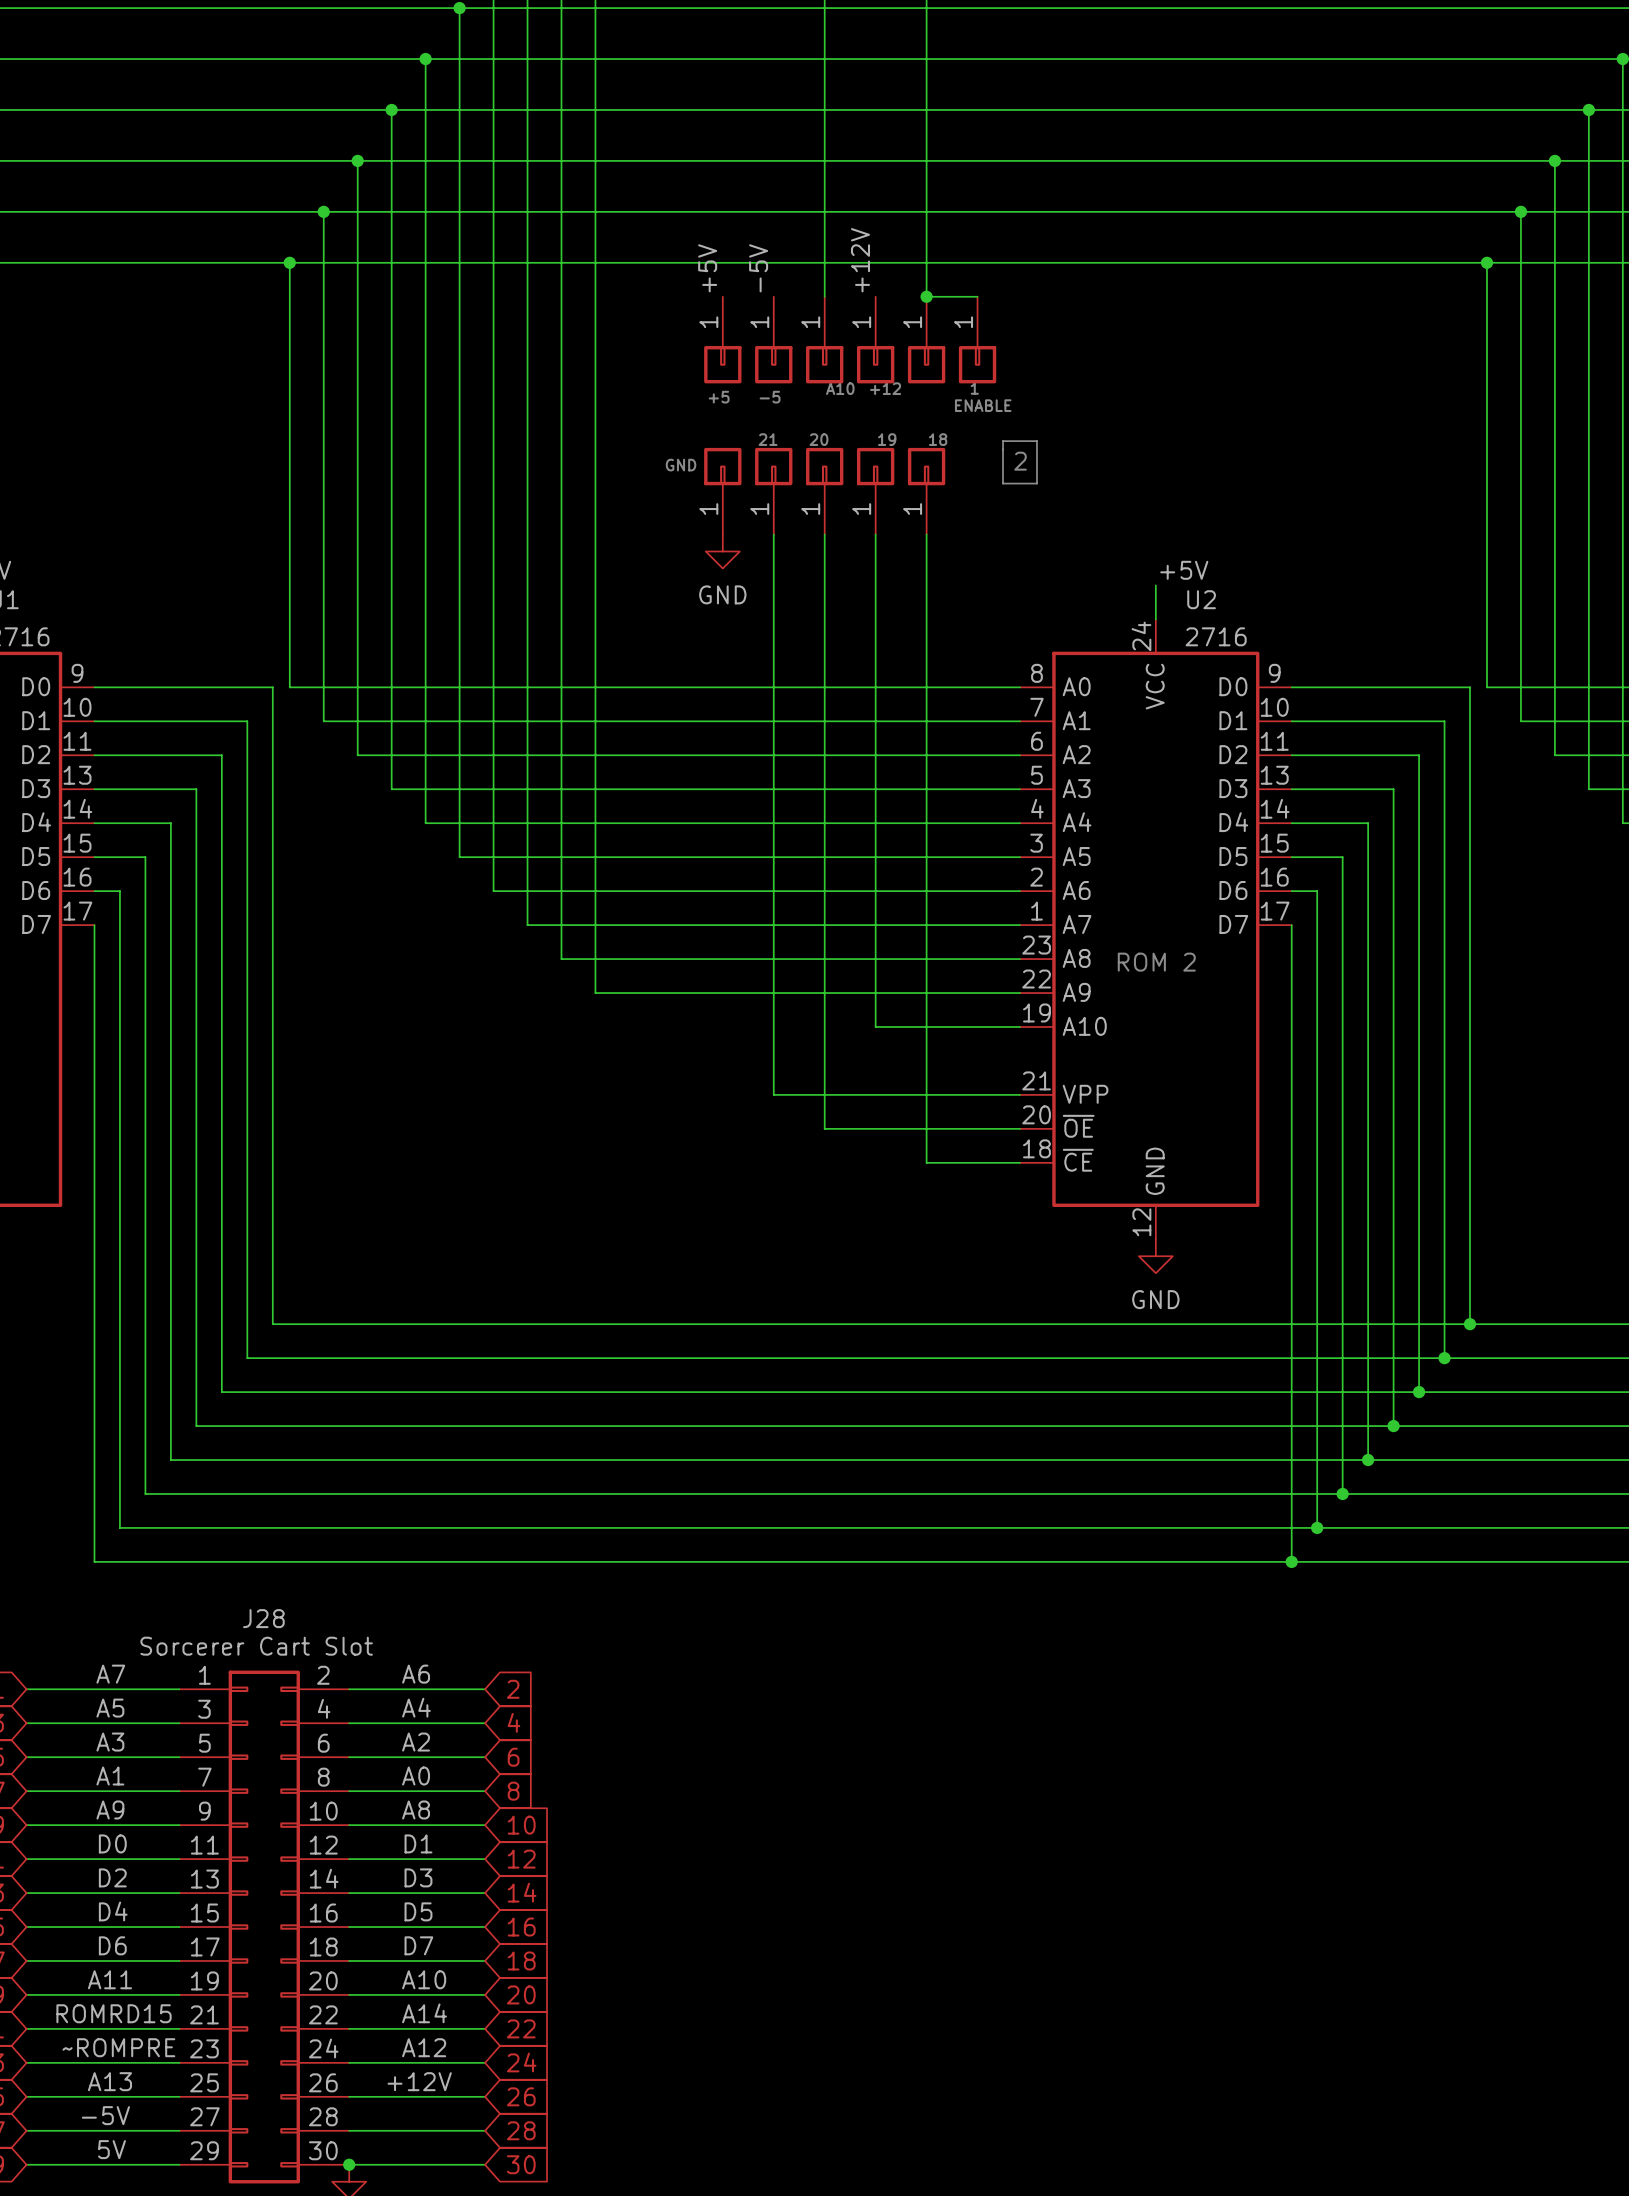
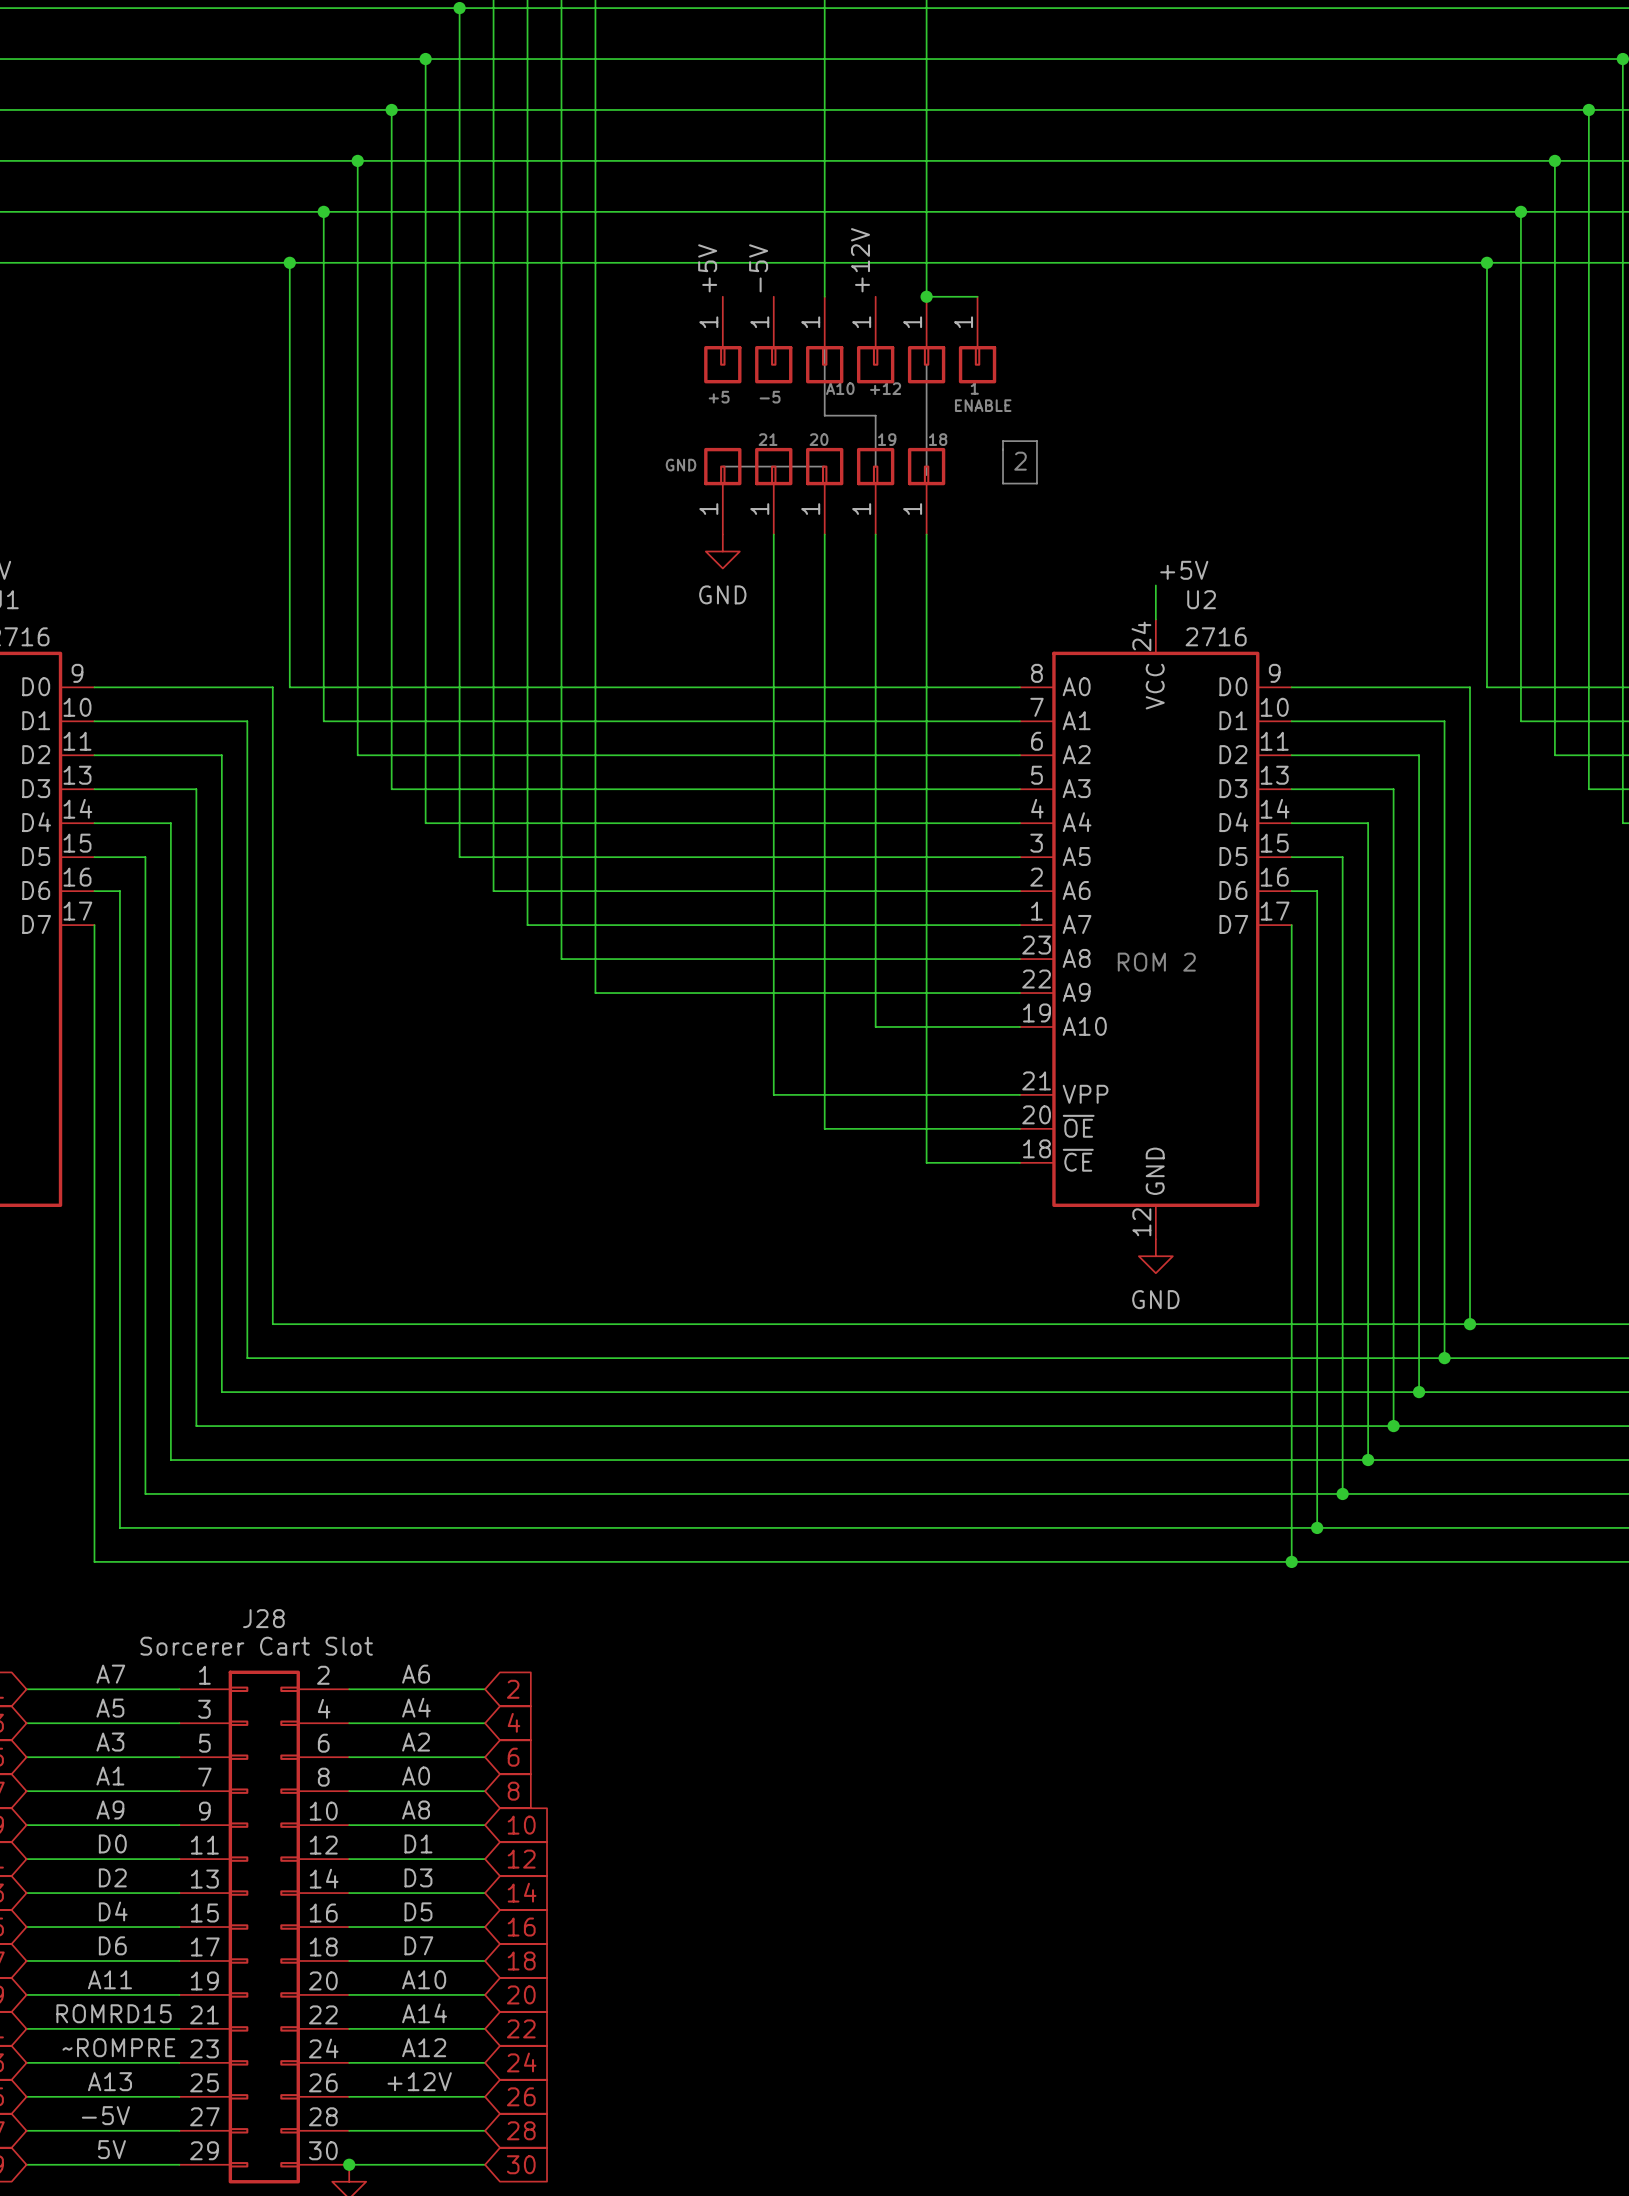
line: none -> (824, 347) (824, 415) (875, 415) (875, 466)
line: none -> (926, 364) (926, 475)
line: none -> (722, 466) (824, 466)

